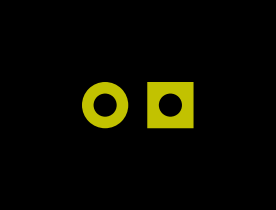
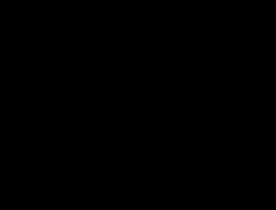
part: (137, 105) -> none

